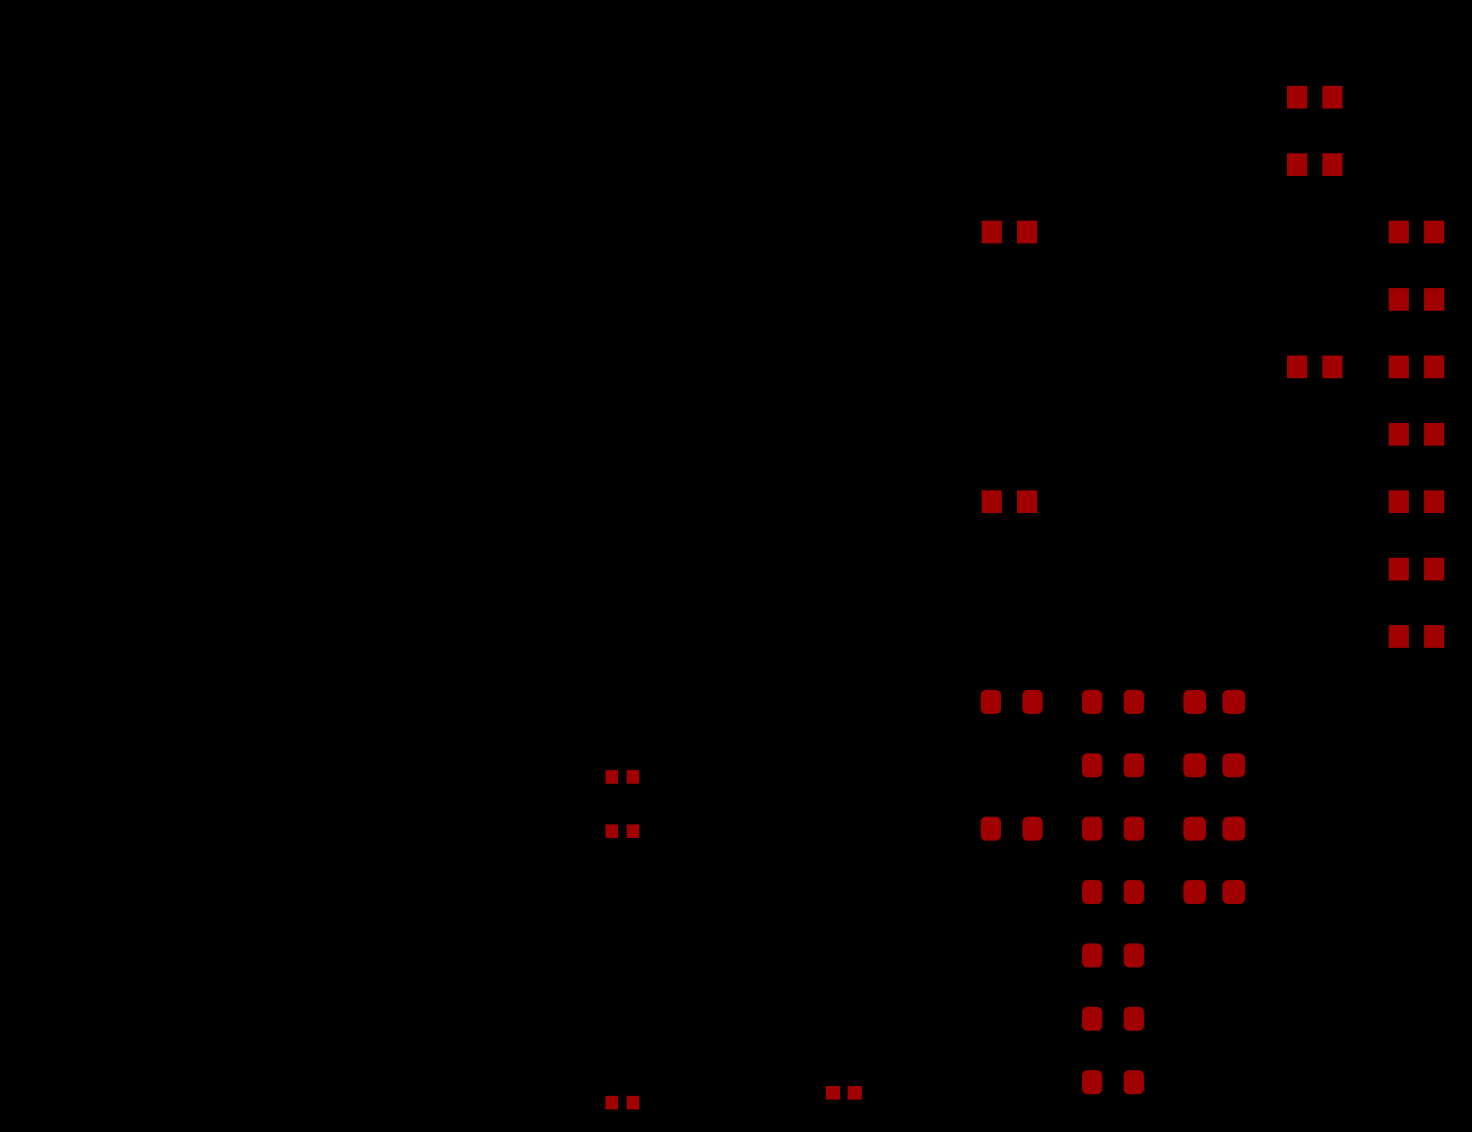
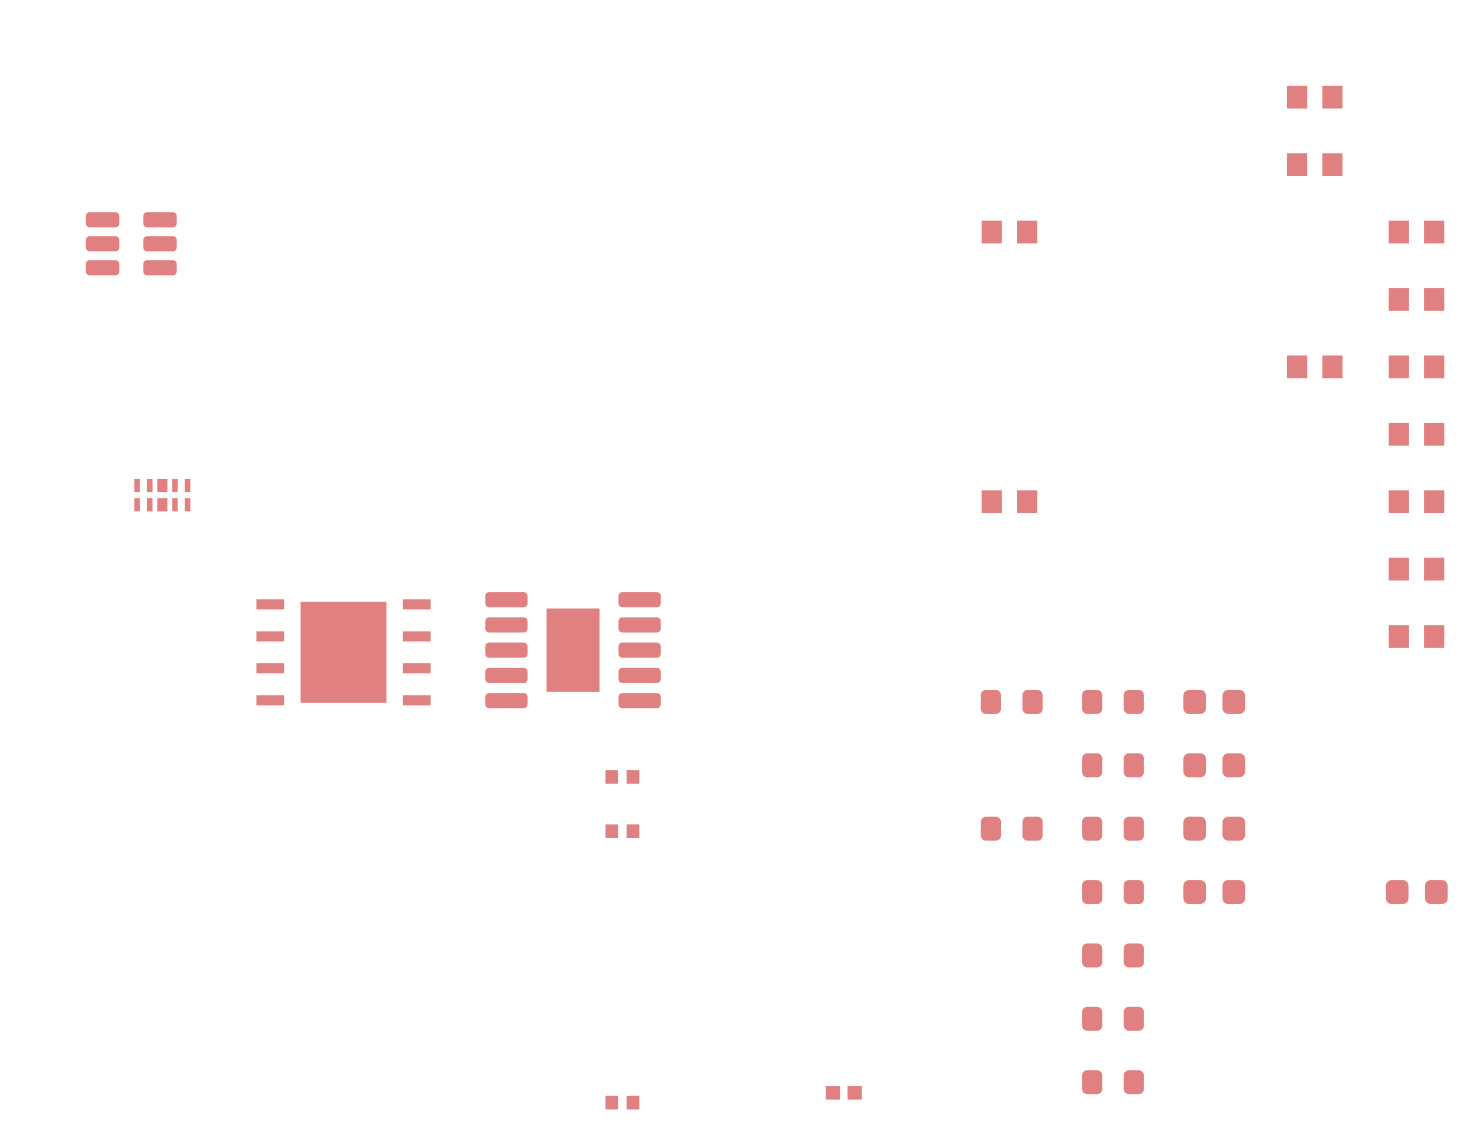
part: none -> (131, 243)
part: none -> (162, 495)
part: none -> (573, 650)
part: none -> (343, 652)
part: none -> (1416, 892)

